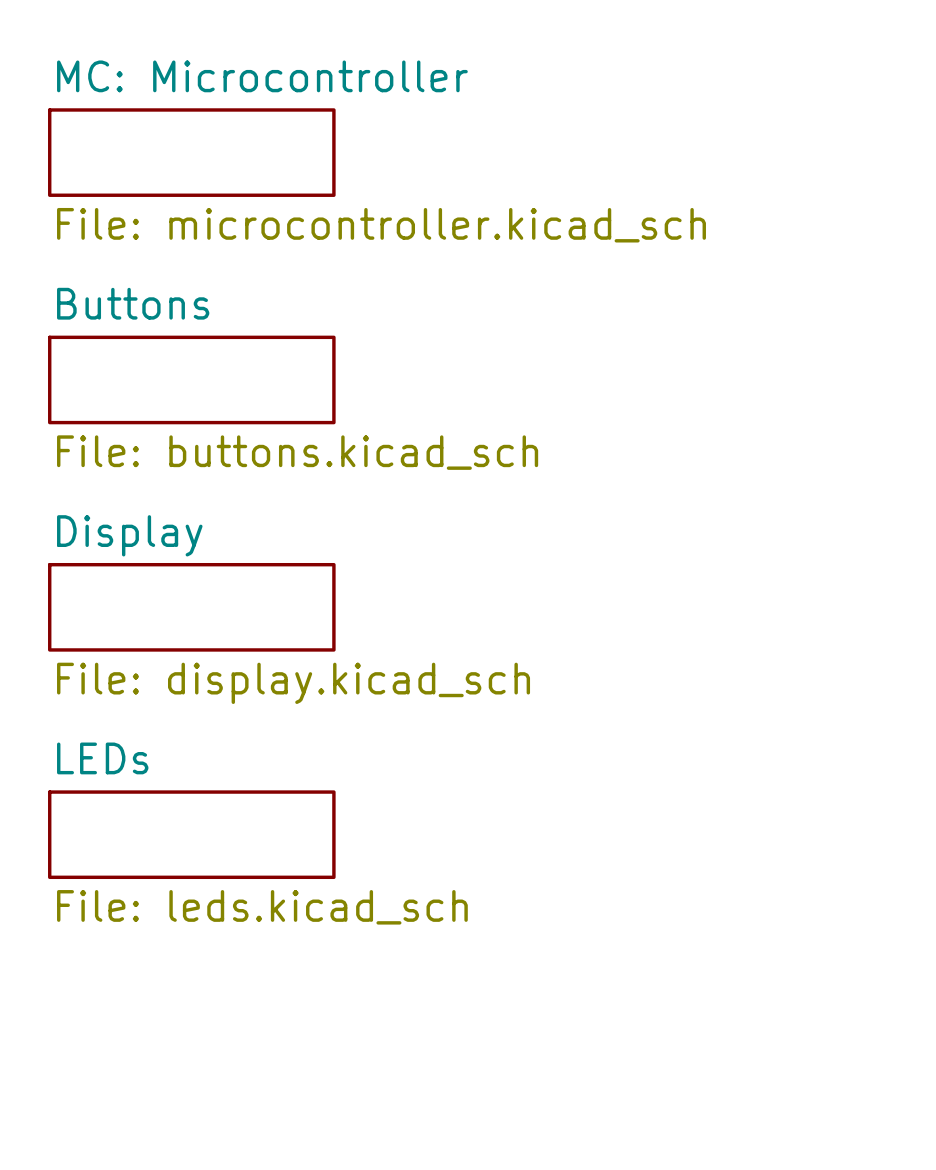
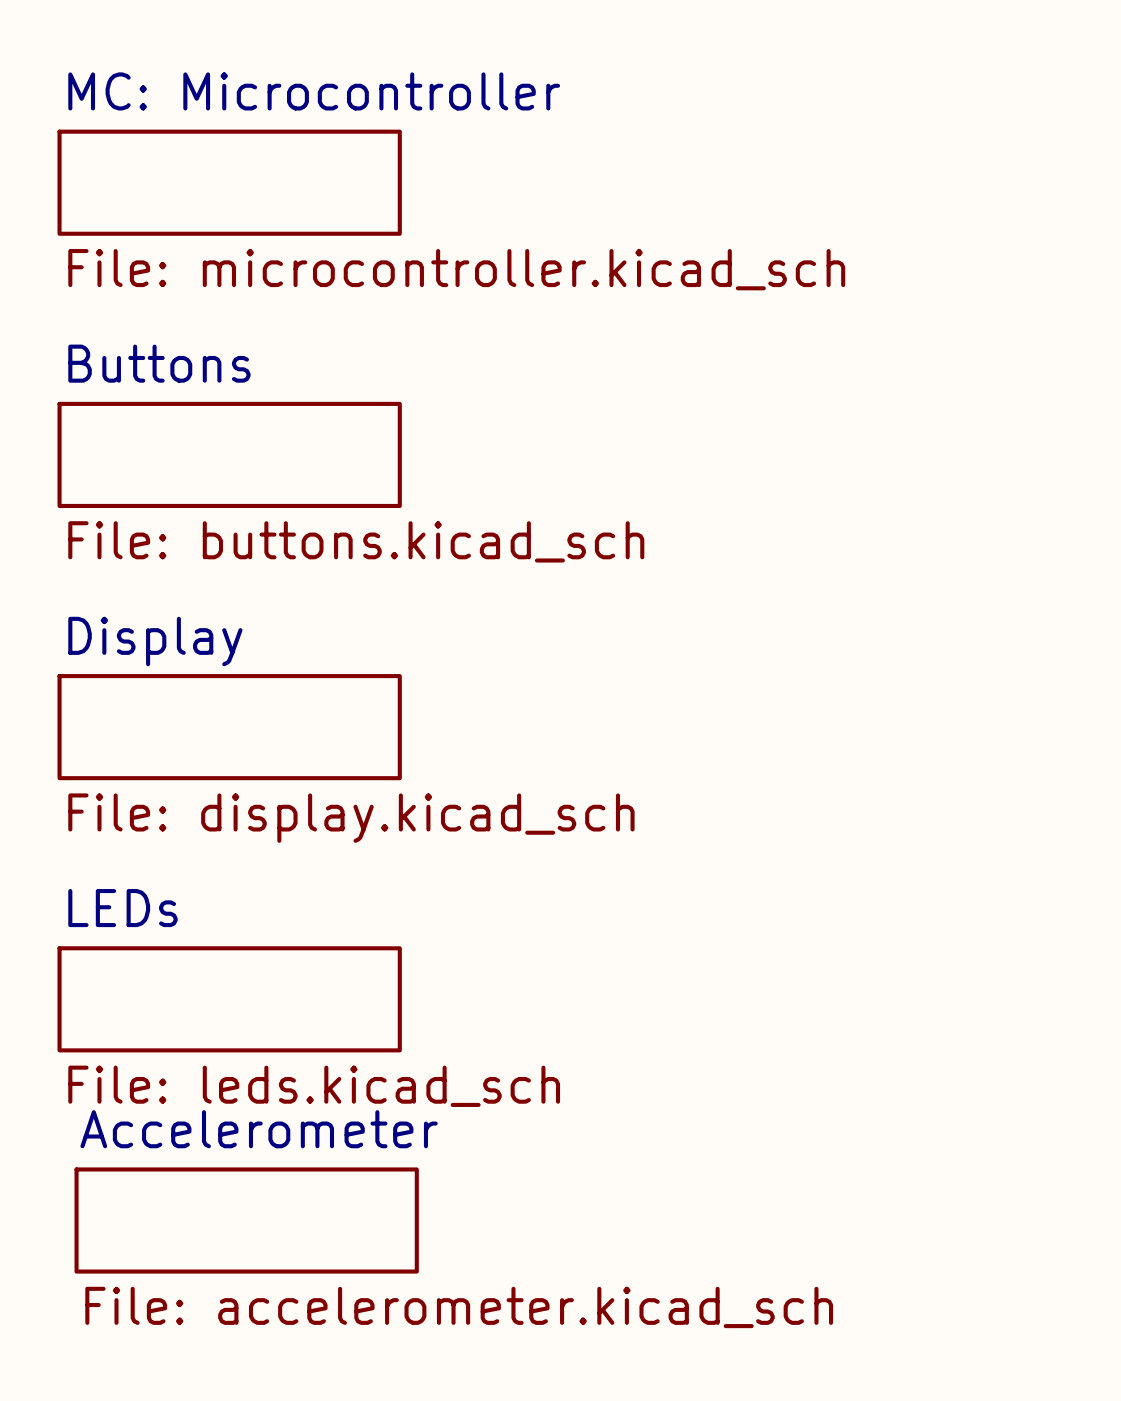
sheet Accelerometer: none -> File: accelerometer.kicad_sch (246, 1220)

